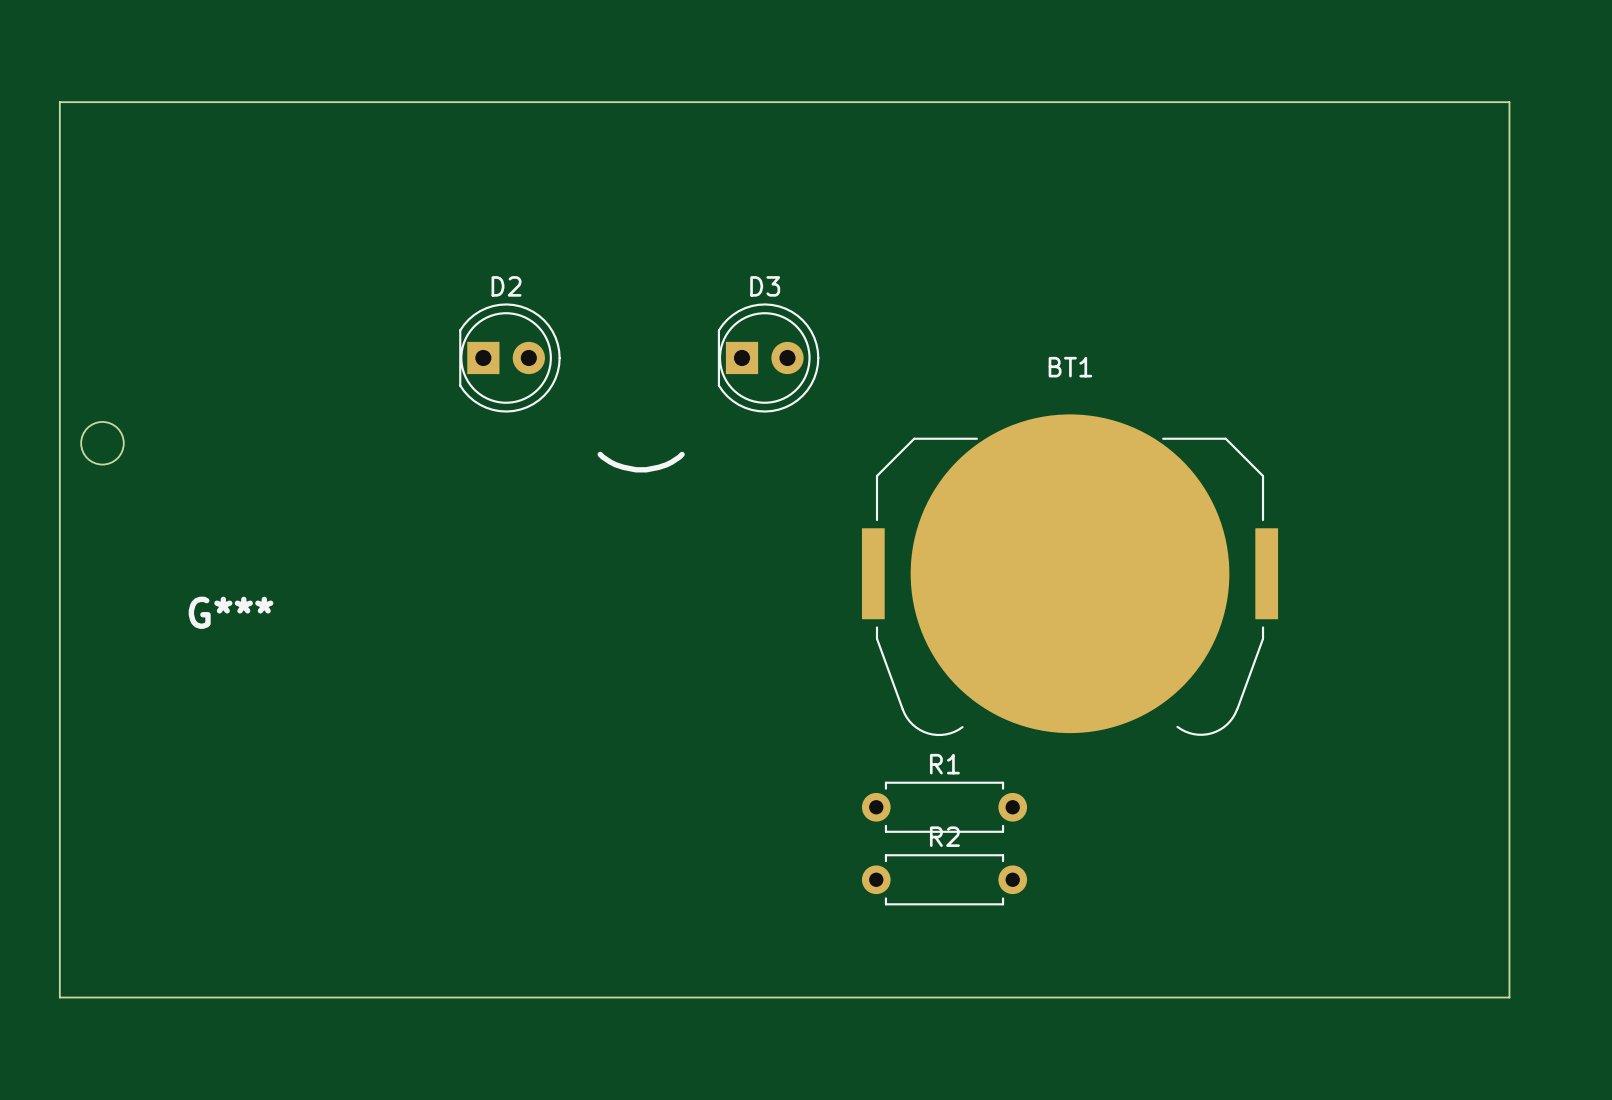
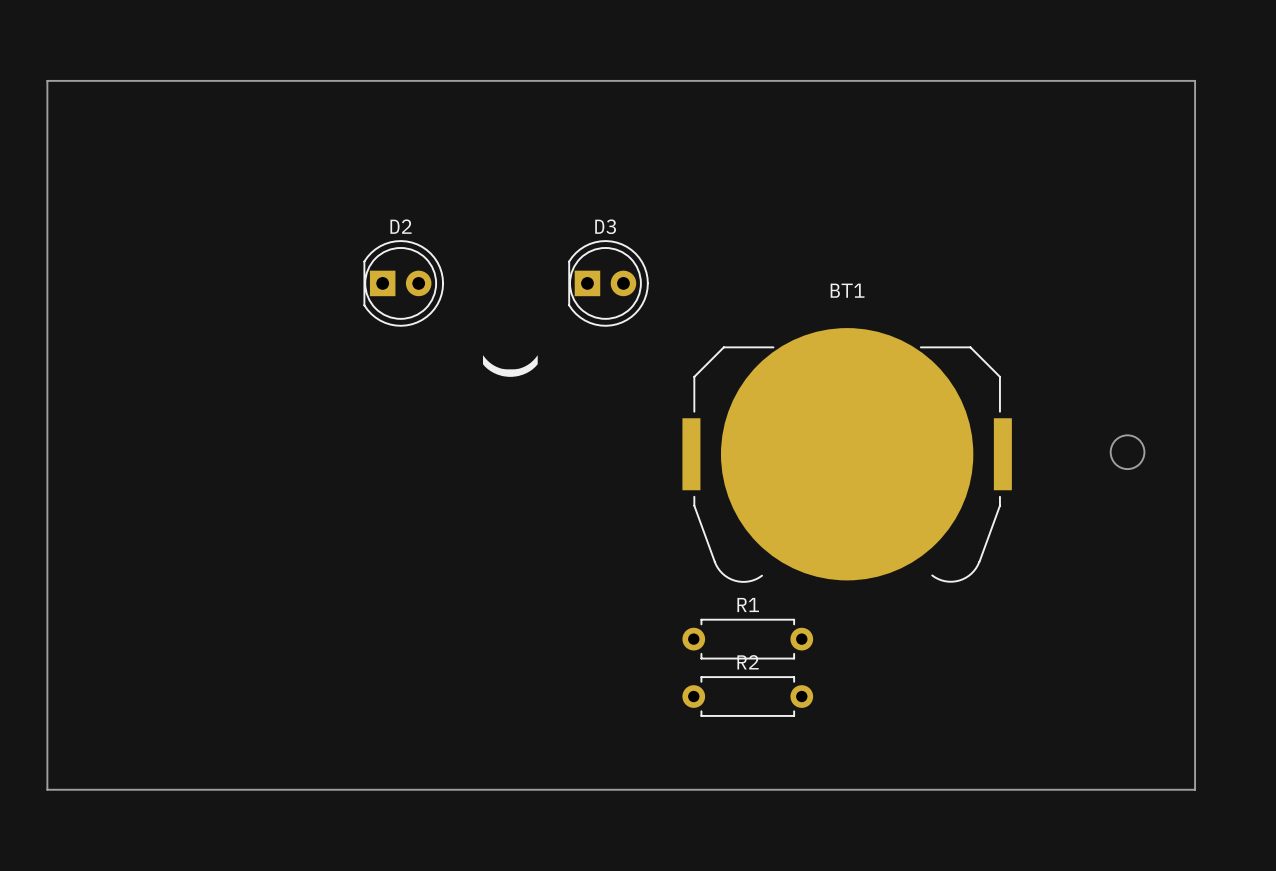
round board edge: [80, 421, 125, 466] -> none
round board edge: none -> [1110, 434, 1145, 470]
G***: (231, 612) -> none

